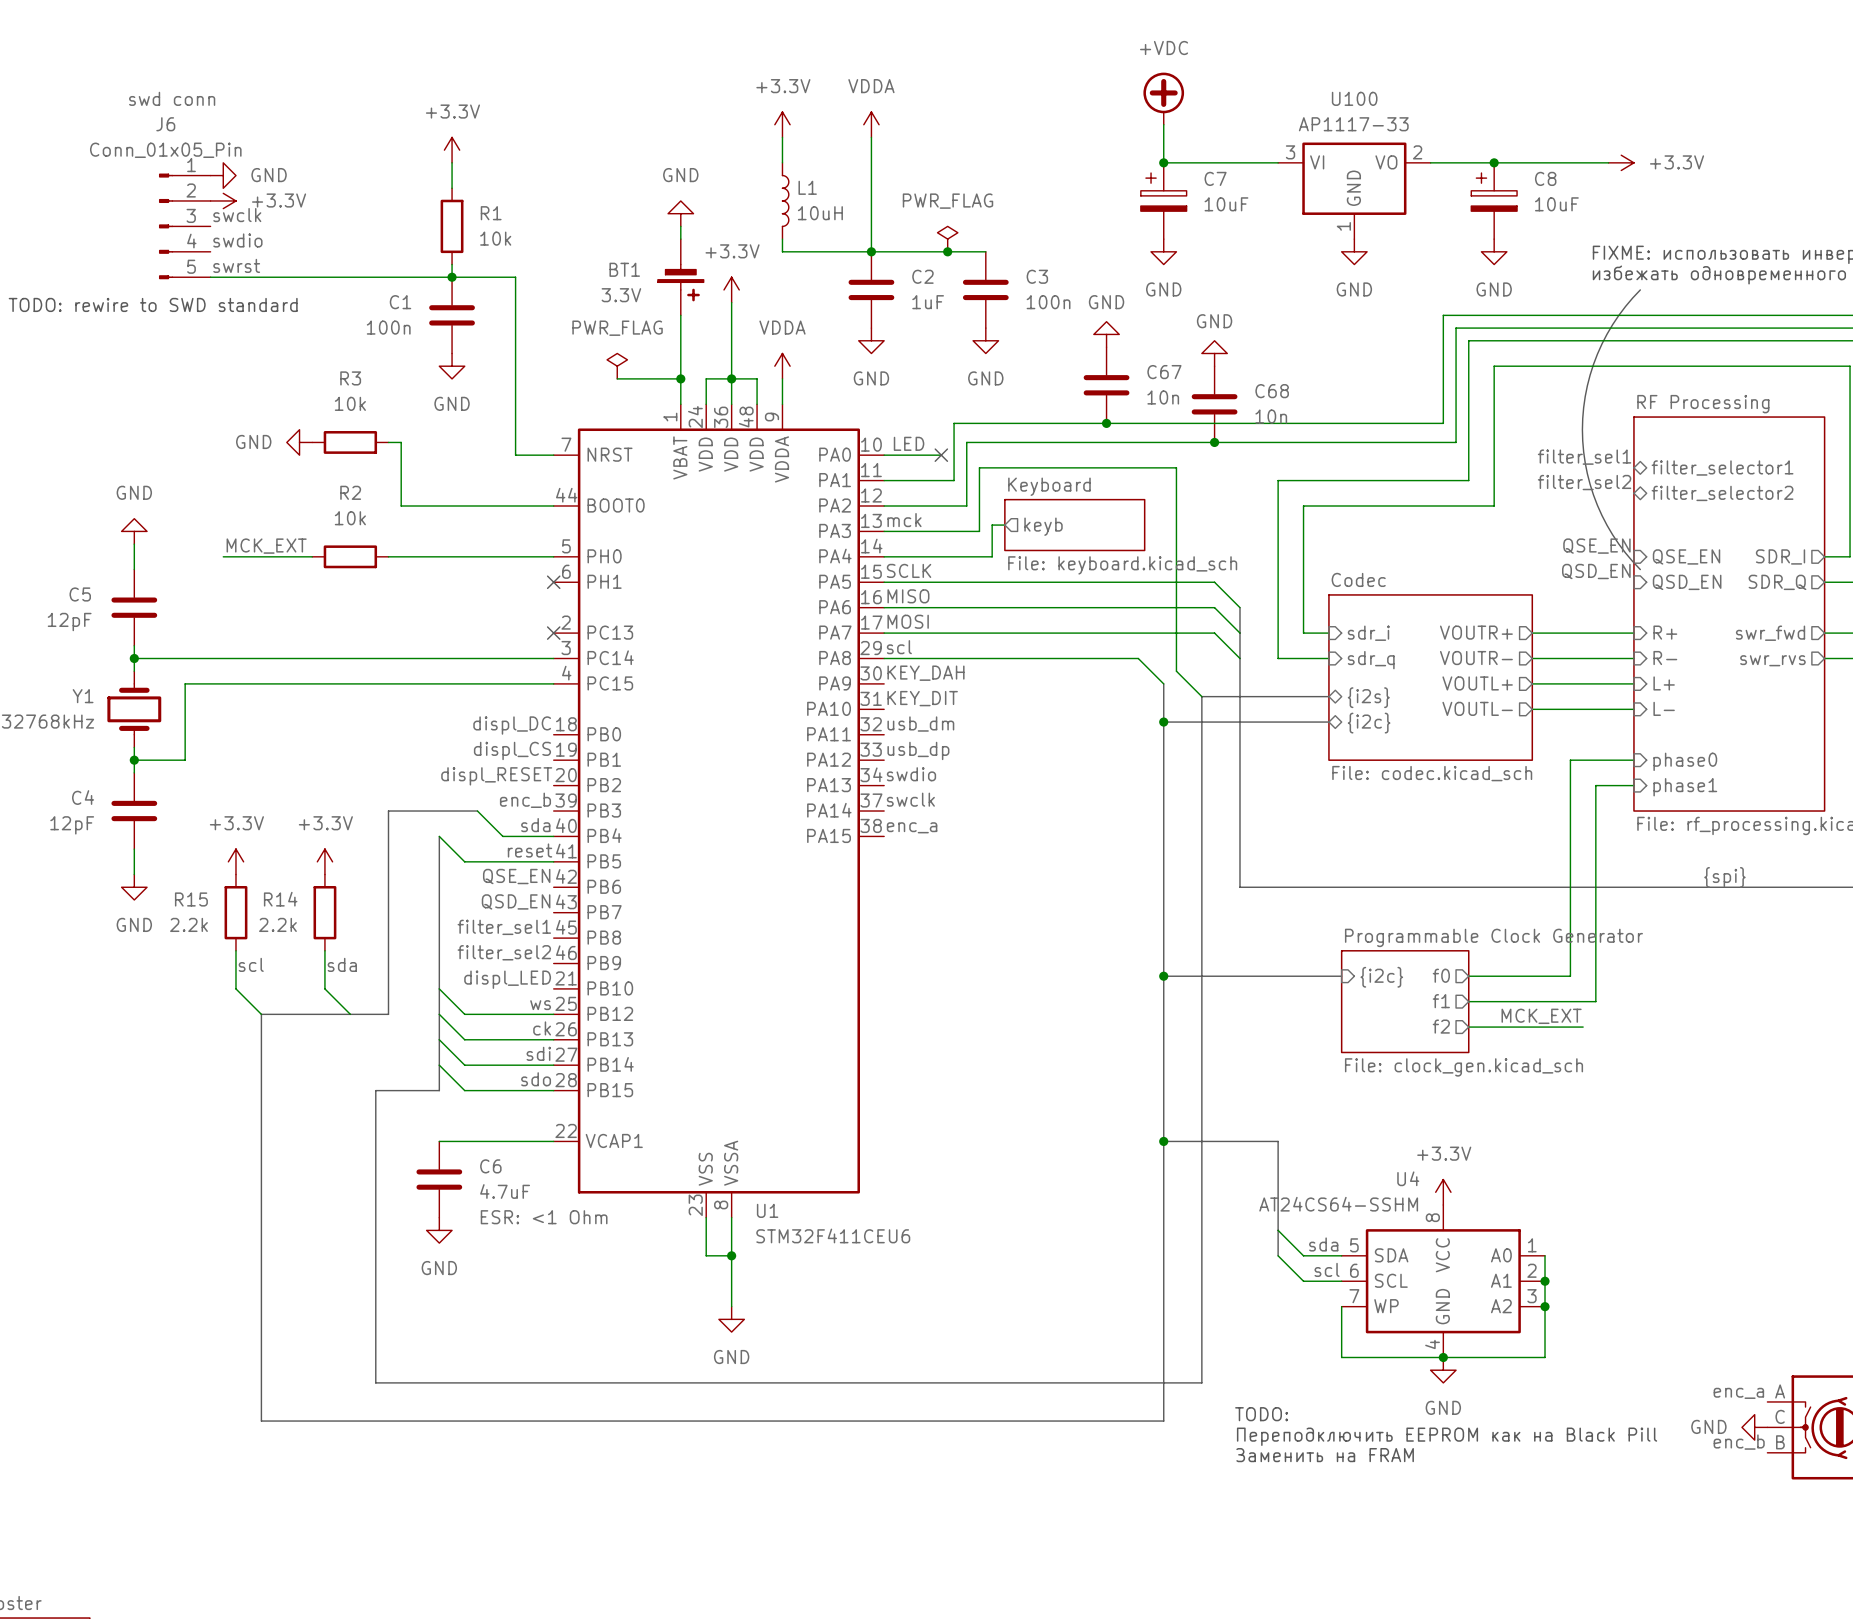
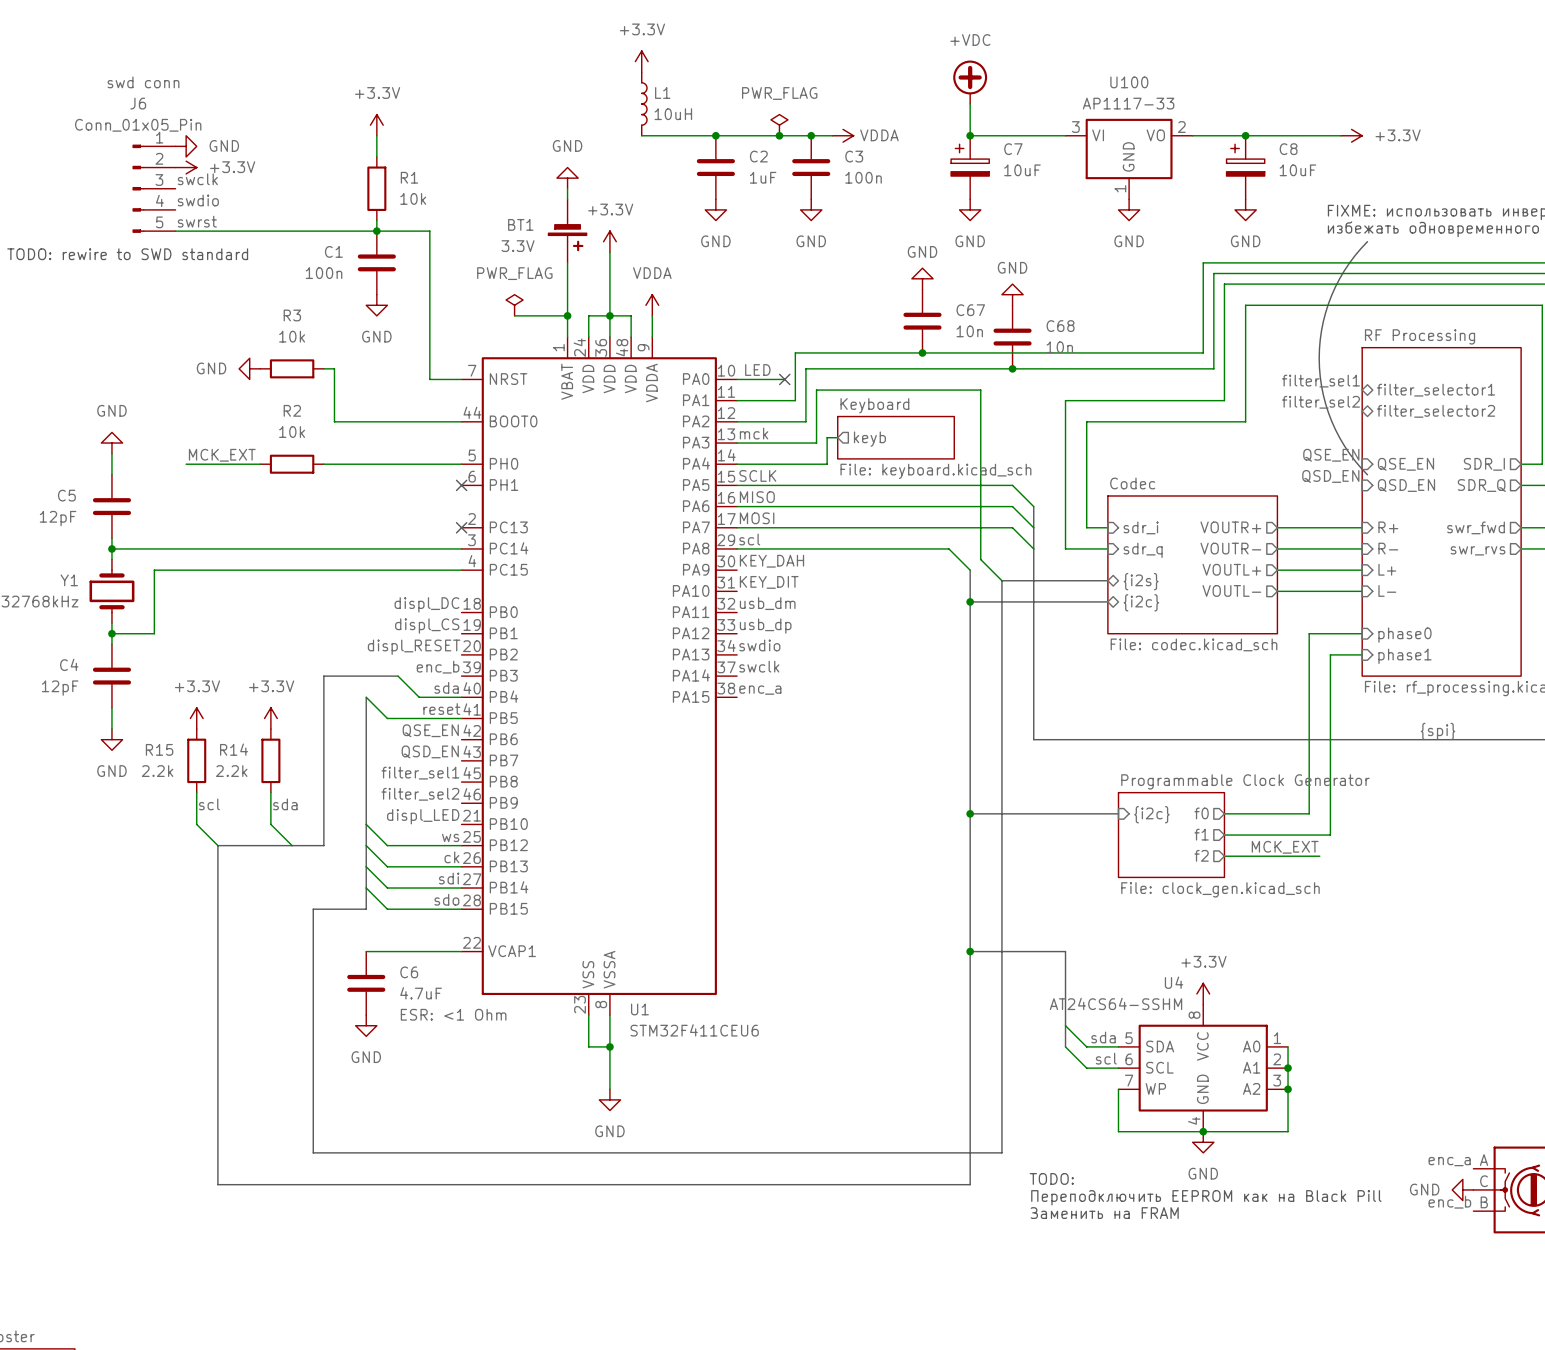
power symbol position: +3.3V (782, 124) -> +3.3V (641, 61)
power symbol rotation: 0° (871, 124) -> 90° clockwise (843, 135)
power symbol position: VDDA (871, 124) -> VDDA (843, 135)
wire: (782, 137) (782, 162) -> none
wire: (871, 137) (871, 251) -> none
wire: none -> (641, 135) (832, 135)
junction: none -> (715, 135)
junction: none -> (779, 135)
junction: none -> (811, 135)
L1 position: (785, 200) -> (644, 103)
wire: (782, 239) (782, 251) (985, 251) -> none
power symbol position: PWR_FLAG (947, 239) -> PWR_FLAG (779, 125)
power symbol: none -> GND (715, 209)
junction: (871, 251) -> none
junction: (947, 251) -> none
power symbol: none -> GND (811, 209)
C2 position: (871, 289) -> (715, 167)
C3 position: (985, 289) -> (811, 167)
power symbol: GND (871, 340) -> none
power symbol: GND (985, 340) -> none

